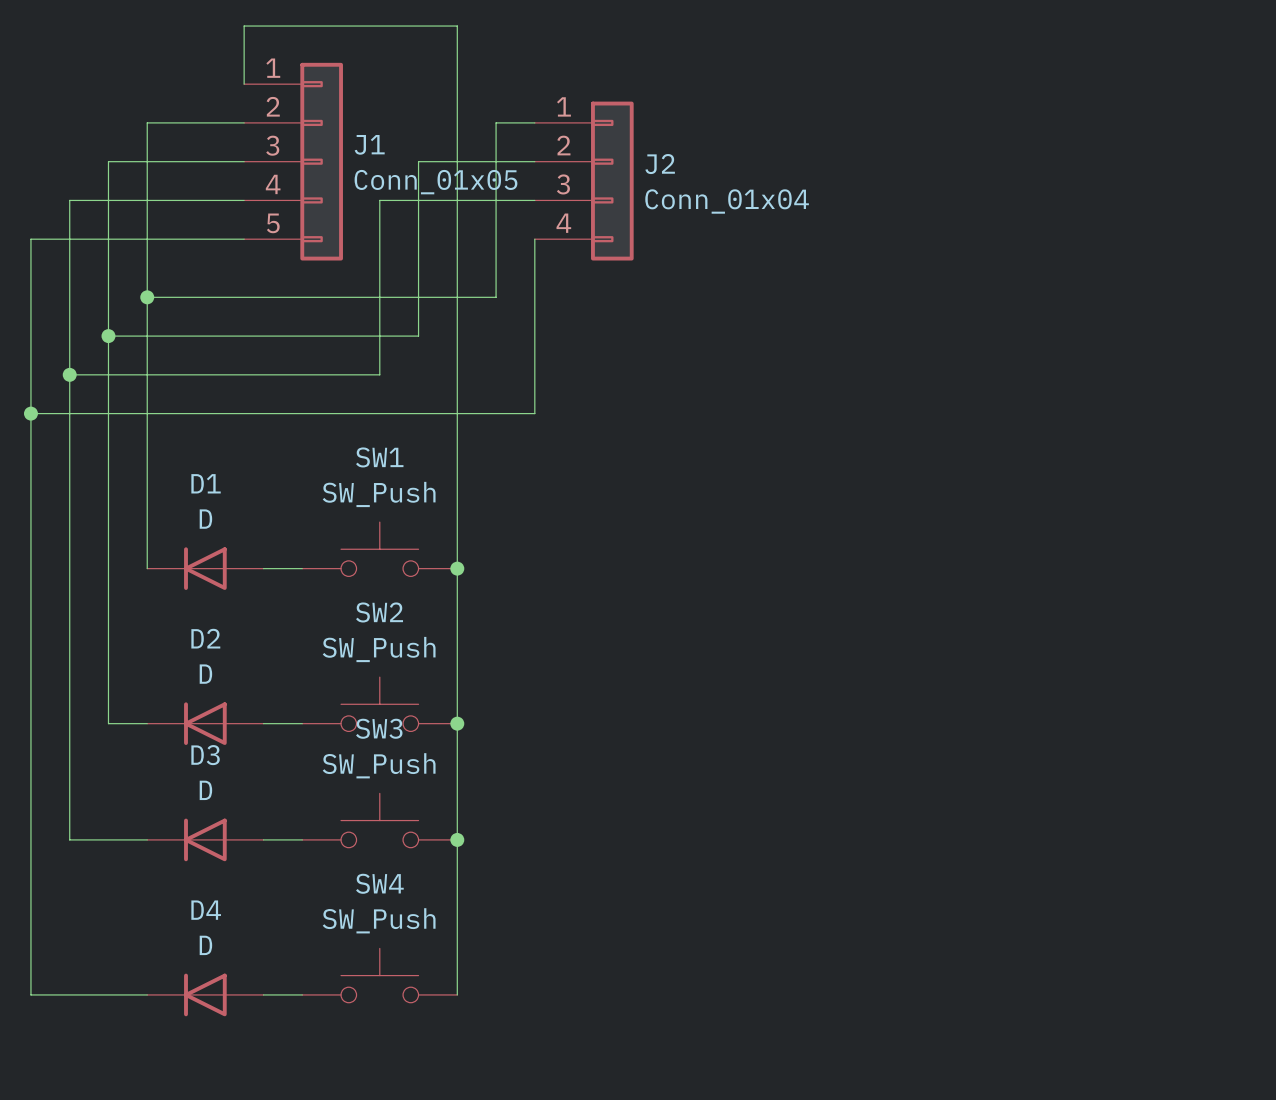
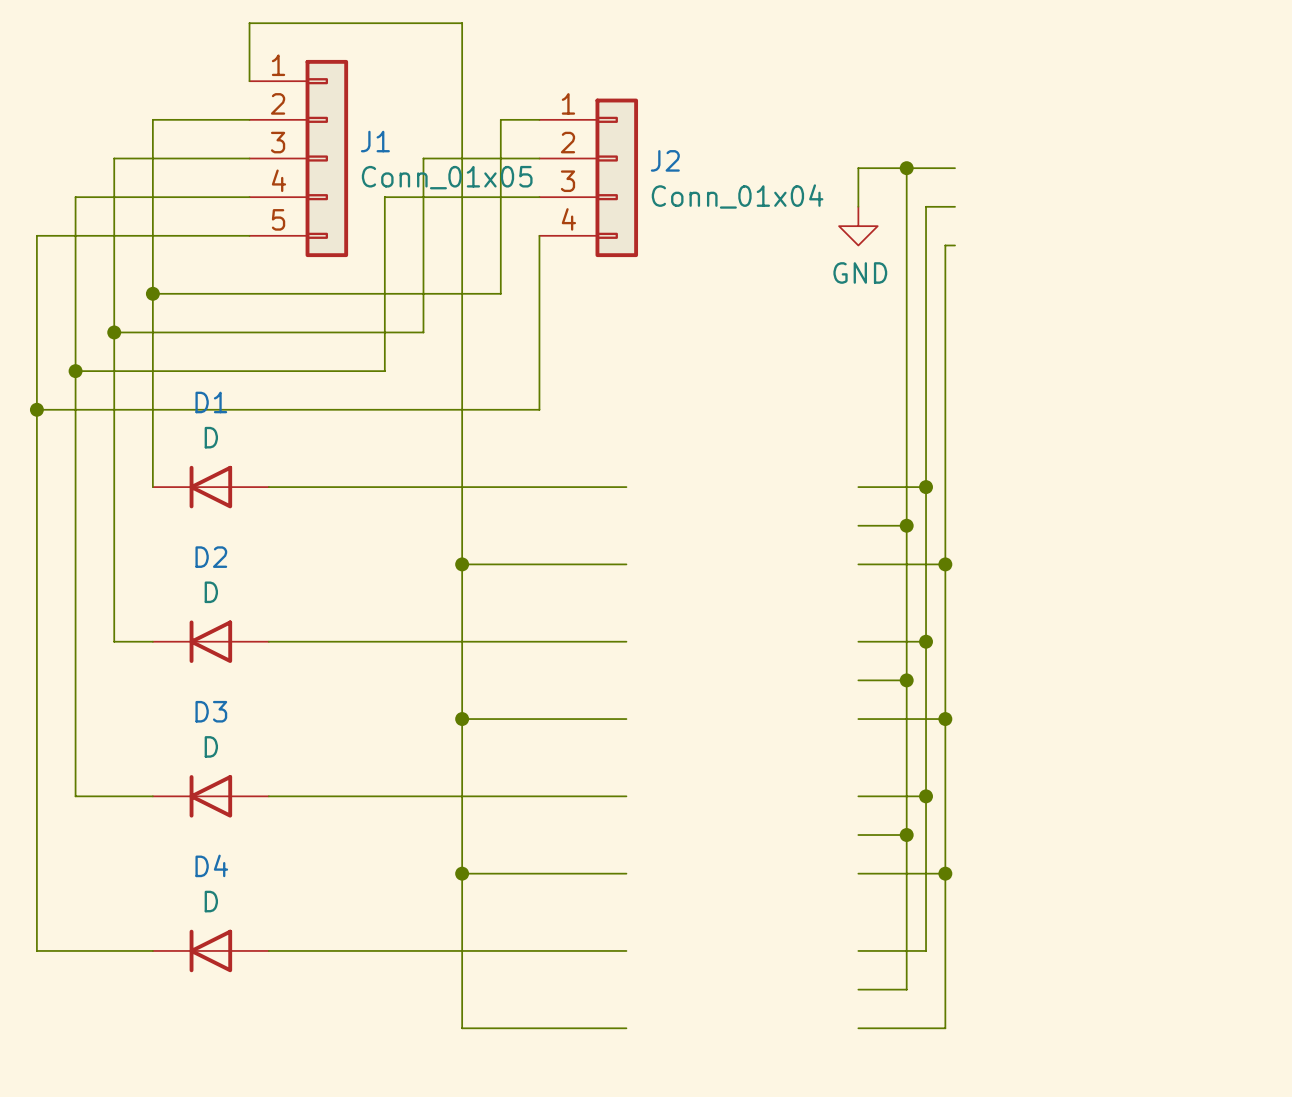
wire: none -> (906, 168) (906, 989) (858, 989)
junction: none -> (906, 168)
wire: none -> (955, 168) (858, 168) (858, 206)
wire: none -> (955, 206) (926, 206) (926, 950) (858, 950)
power symbol: none -> GND (858, 226)
wire: none -> (955, 245) (945, 245) (945, 1028) (858, 1028)
wire: (147, 491) (147, 568) -> none
wire: none -> (268, 487) (626, 487)
wire: none -> (858, 487) (926, 487)
junction: none -> (926, 487)
wire: none -> (858, 525) (906, 525)
junction: none -> (906, 525)
SW1: SW_Push (379, 549) -> none
D1 position: (205, 568) -> (210, 487)
wire: (263, 568) (302, 568) -> none
wire: none -> (462, 564) (626, 564)
wire: none -> (858, 564) (945, 564)
junction: none -> (945, 564)
wire: (108, 646) (108, 723) (147, 723) -> (114, 641) (152, 641)
wire: none -> (268, 641) (626, 641)
wire: none -> (858, 641) (926, 641)
junction: none -> (926, 641)
wire: none -> (858, 680) (906, 680)
junction: none -> (906, 680)
SW2: SW_Push (379, 704) -> none
D2 position: (205, 723) -> (210, 641)
wire: (263, 723) (302, 723) -> none
wire: none -> (462, 719) (626, 719)
wire: none -> (858, 719) (945, 719)
junction: none -> (945, 719)
wire: (69, 801) (69, 839) (147, 839) -> (75, 796) (152, 796)
wire: none -> (268, 796) (626, 796)
wire: none -> (858, 796) (926, 796)
junction: none -> (926, 796)
SW3: SW_Push (379, 820) -> none
D3 position: (205, 839) -> (210, 796)
wire: (263, 839) (302, 839) -> none
junction position: (457, 839) -> (462, 873)
wire: none -> (858, 835) (906, 835)
junction: none -> (906, 835)
wire: none -> (462, 873) (626, 873)
wire: none -> (858, 873) (945, 873)
junction: none -> (945, 873)
wire: (30, 956) (30, 994) (147, 994) -> (36, 950) (152, 950)
wire: none -> (268, 950) (626, 950)
SW4: SW_Push (379, 975) -> none
D4 position: (205, 994) -> (210, 950)
wire: (263, 994) (302, 994) -> none
wire: none -> (462, 989) (462, 1028) (626, 1028)

